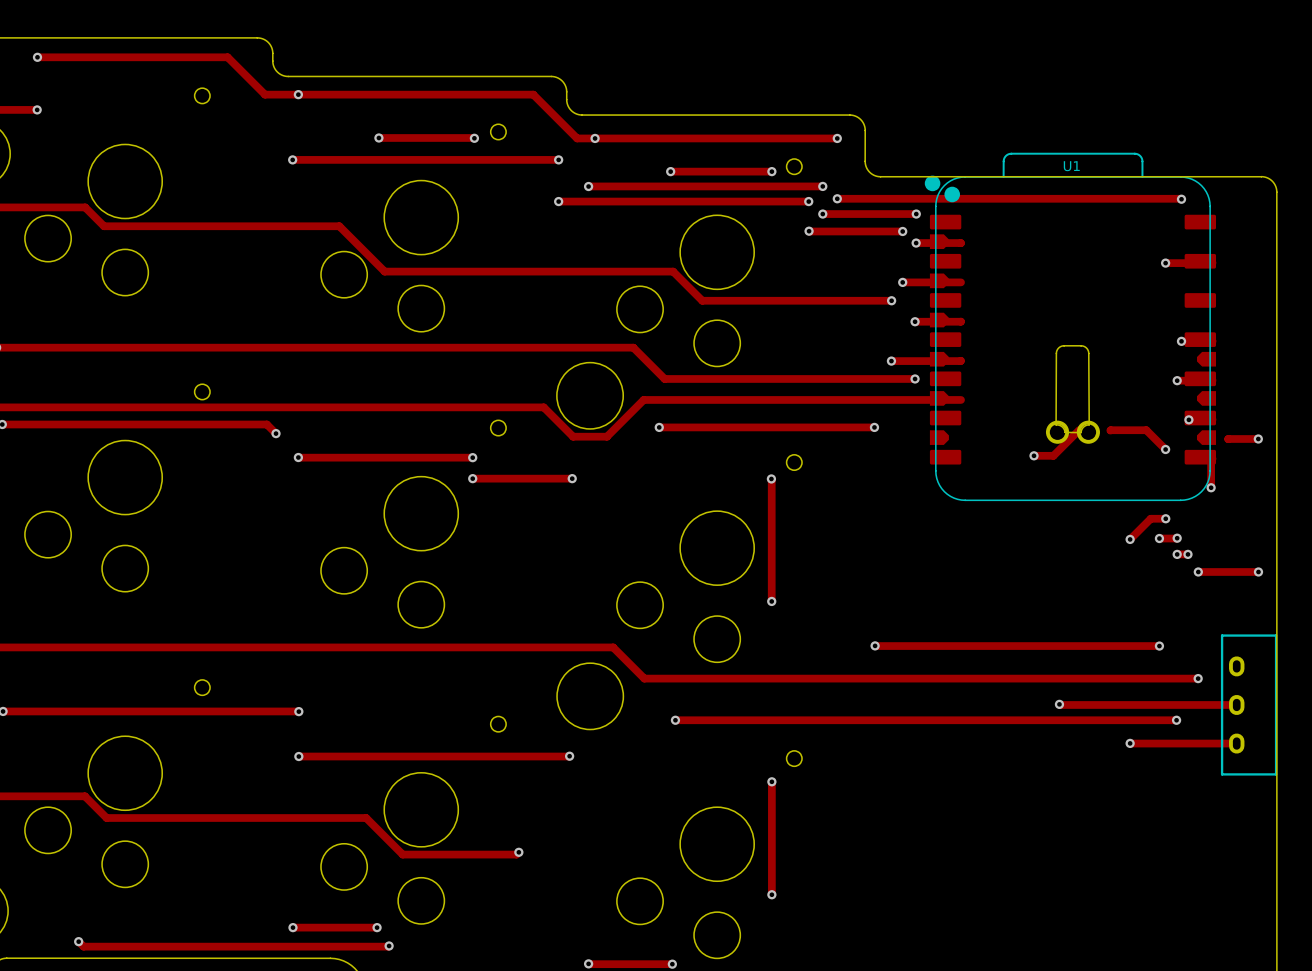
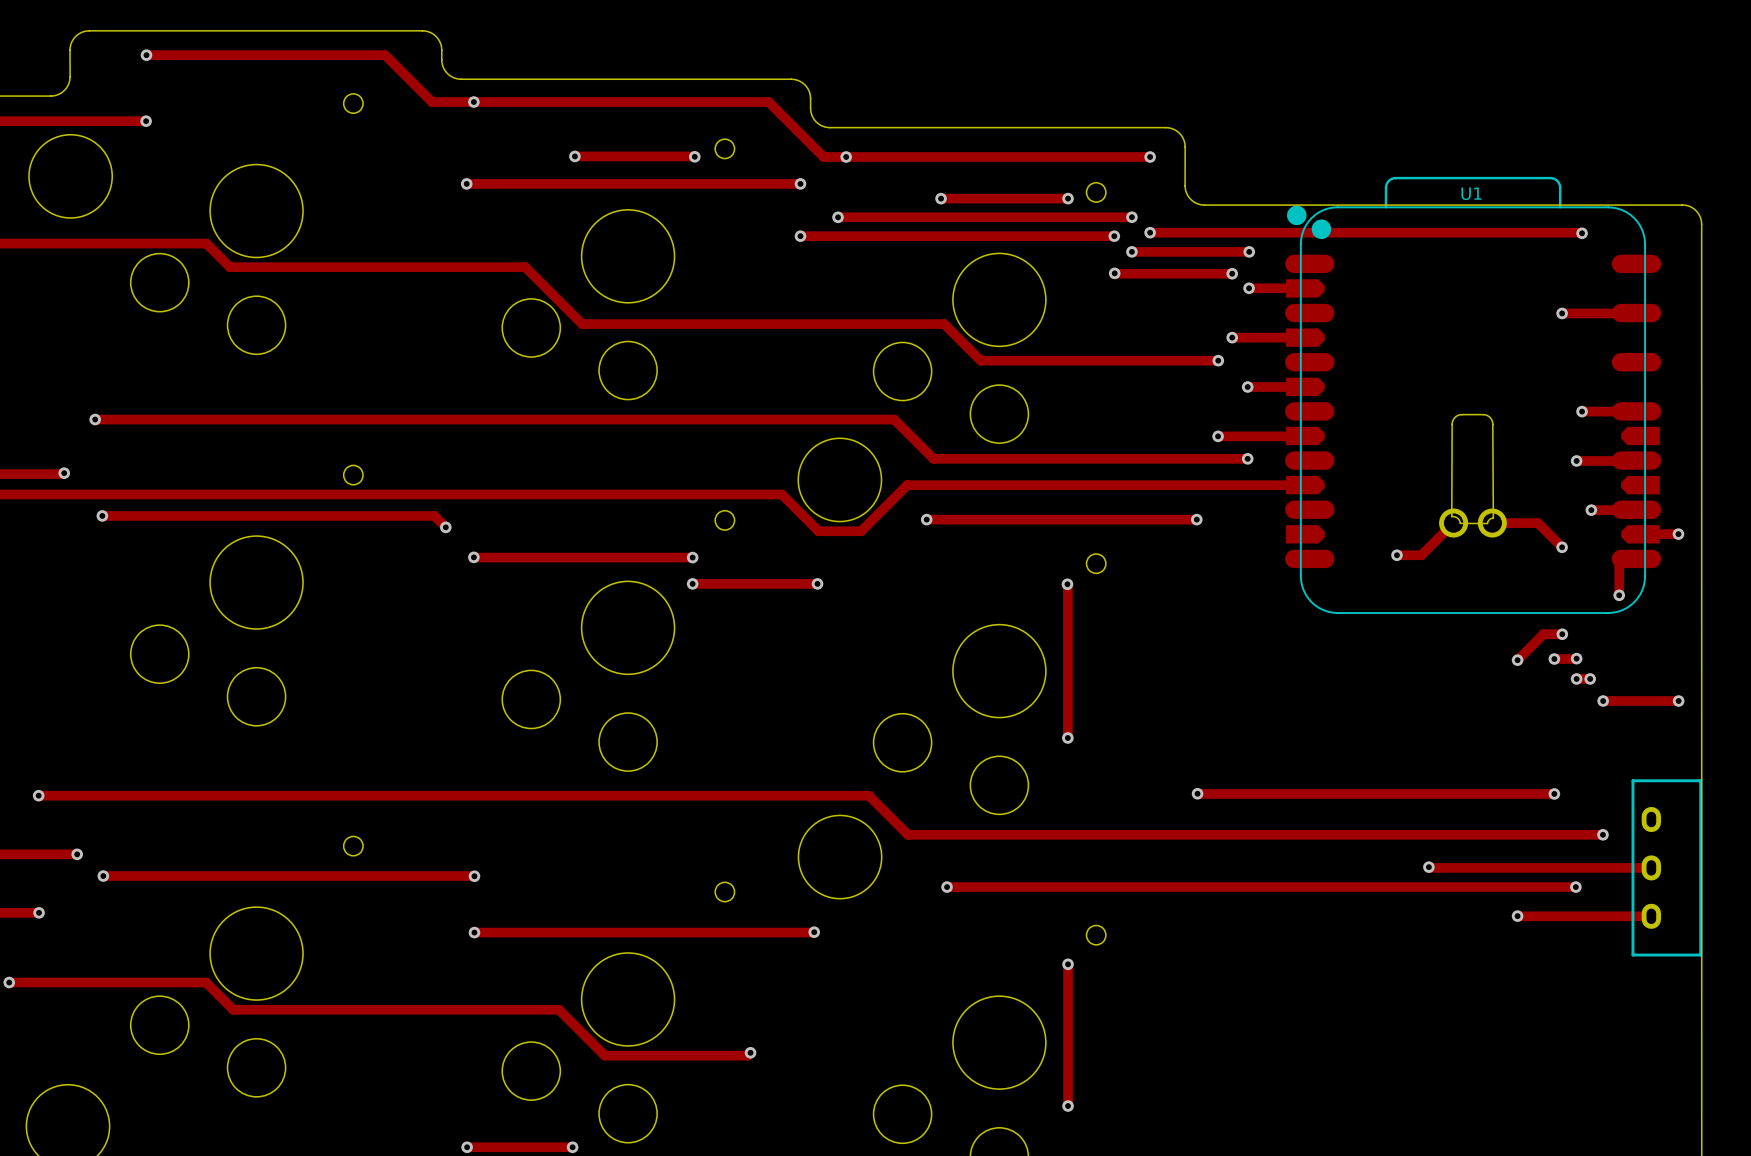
U1 footprint: [924, 152, 1217, 502] -> [1285, 176, 1662, 614]

